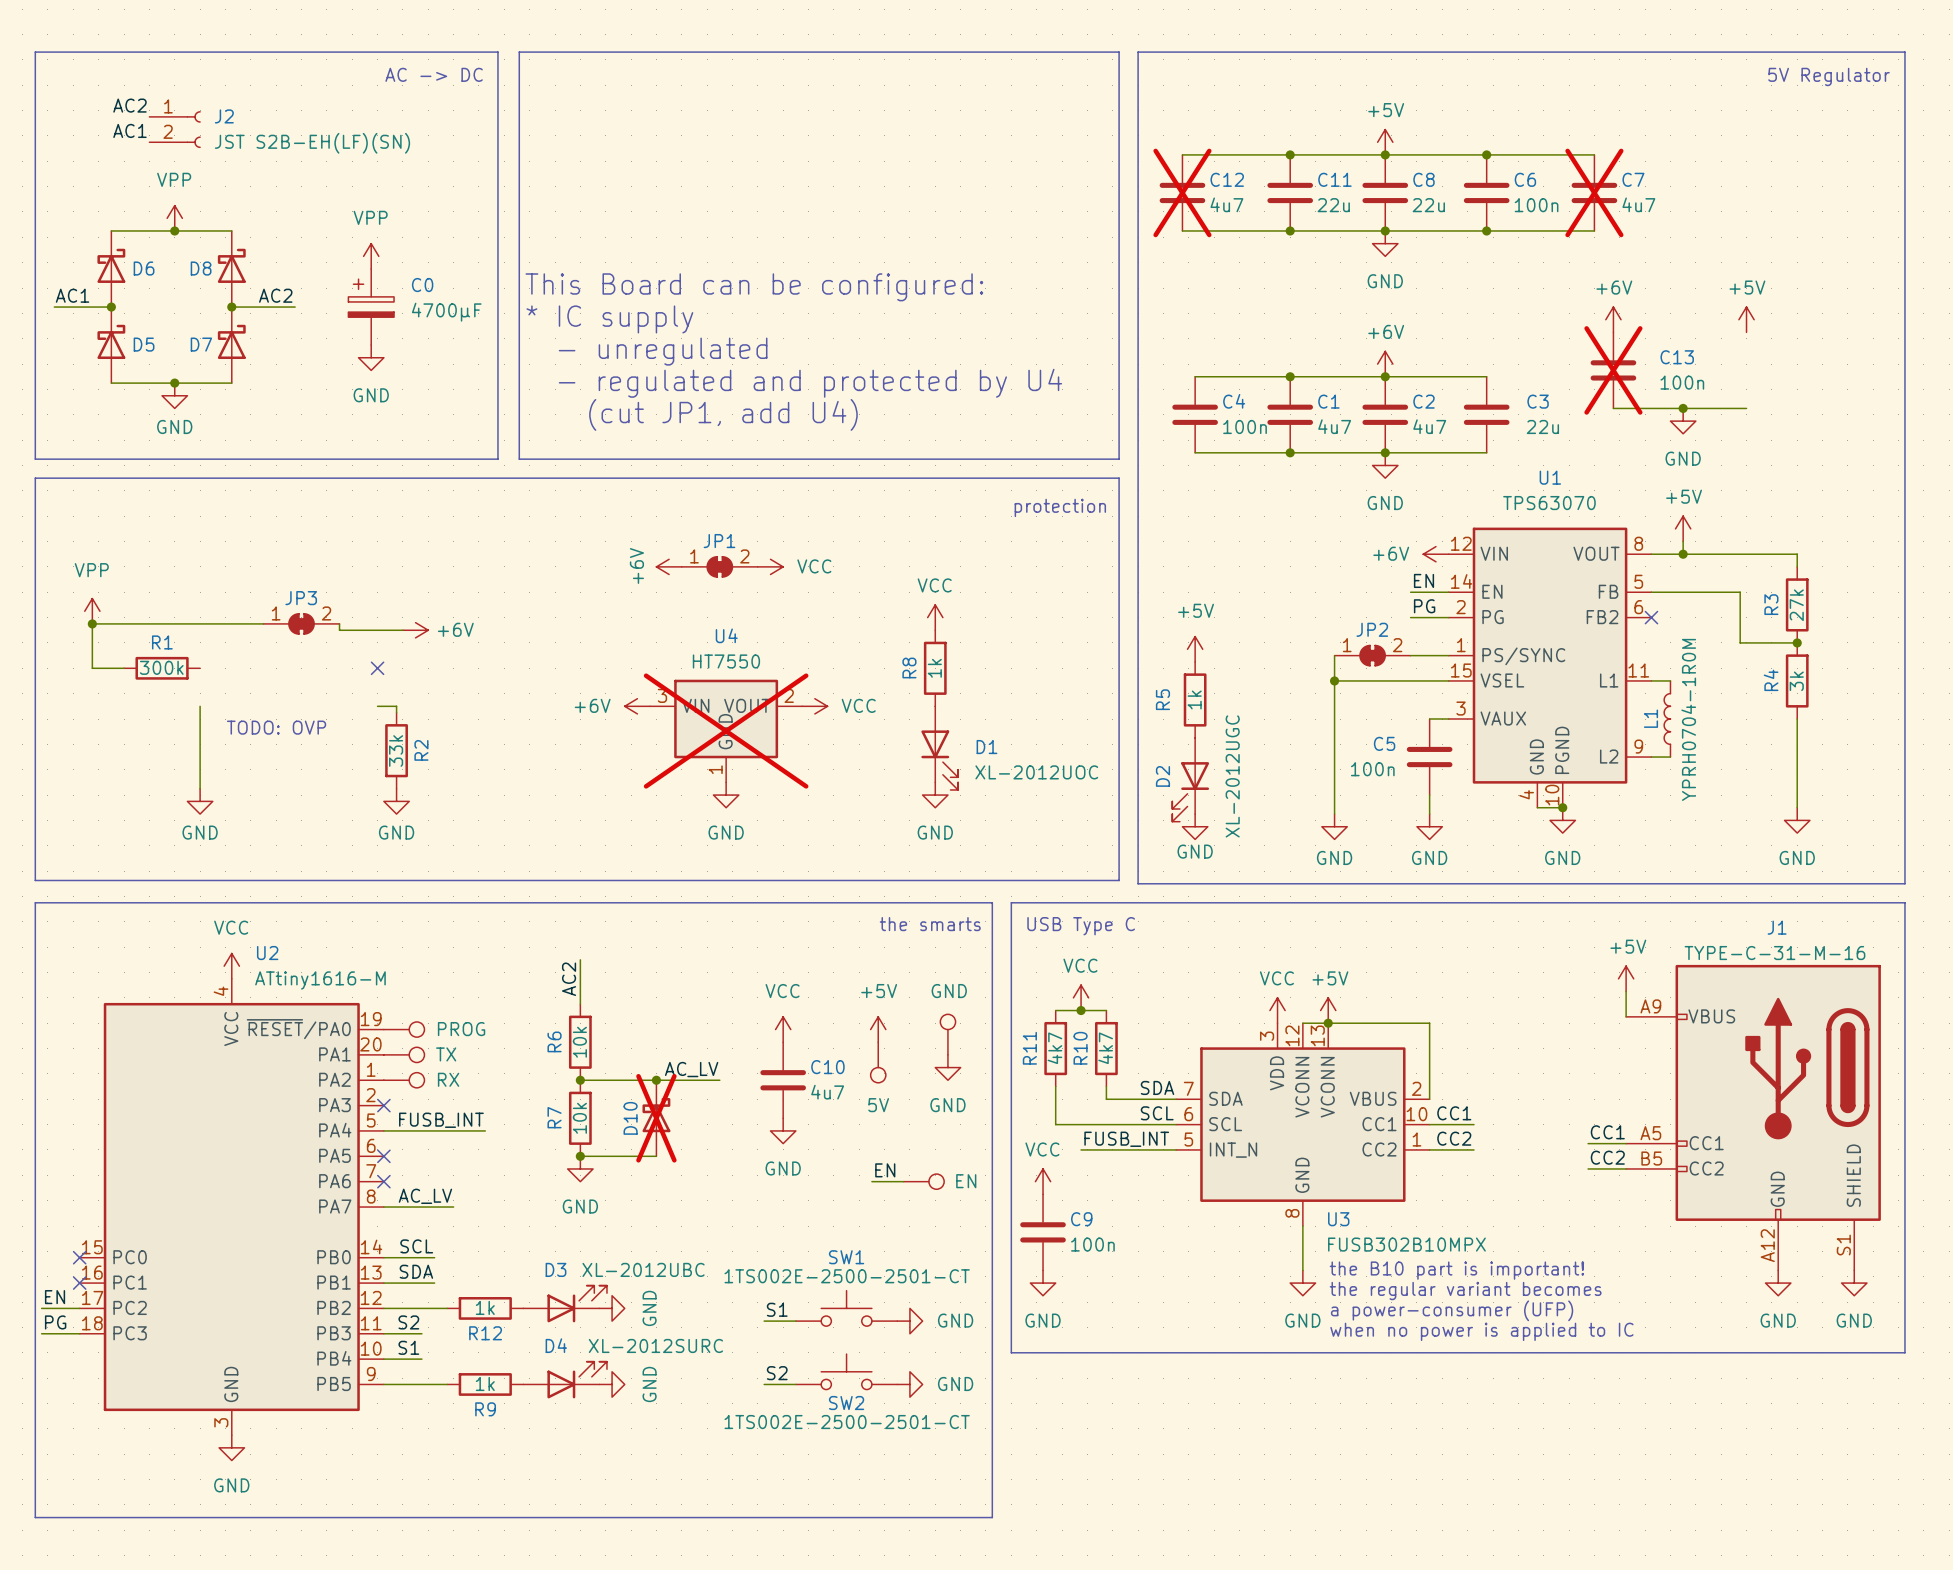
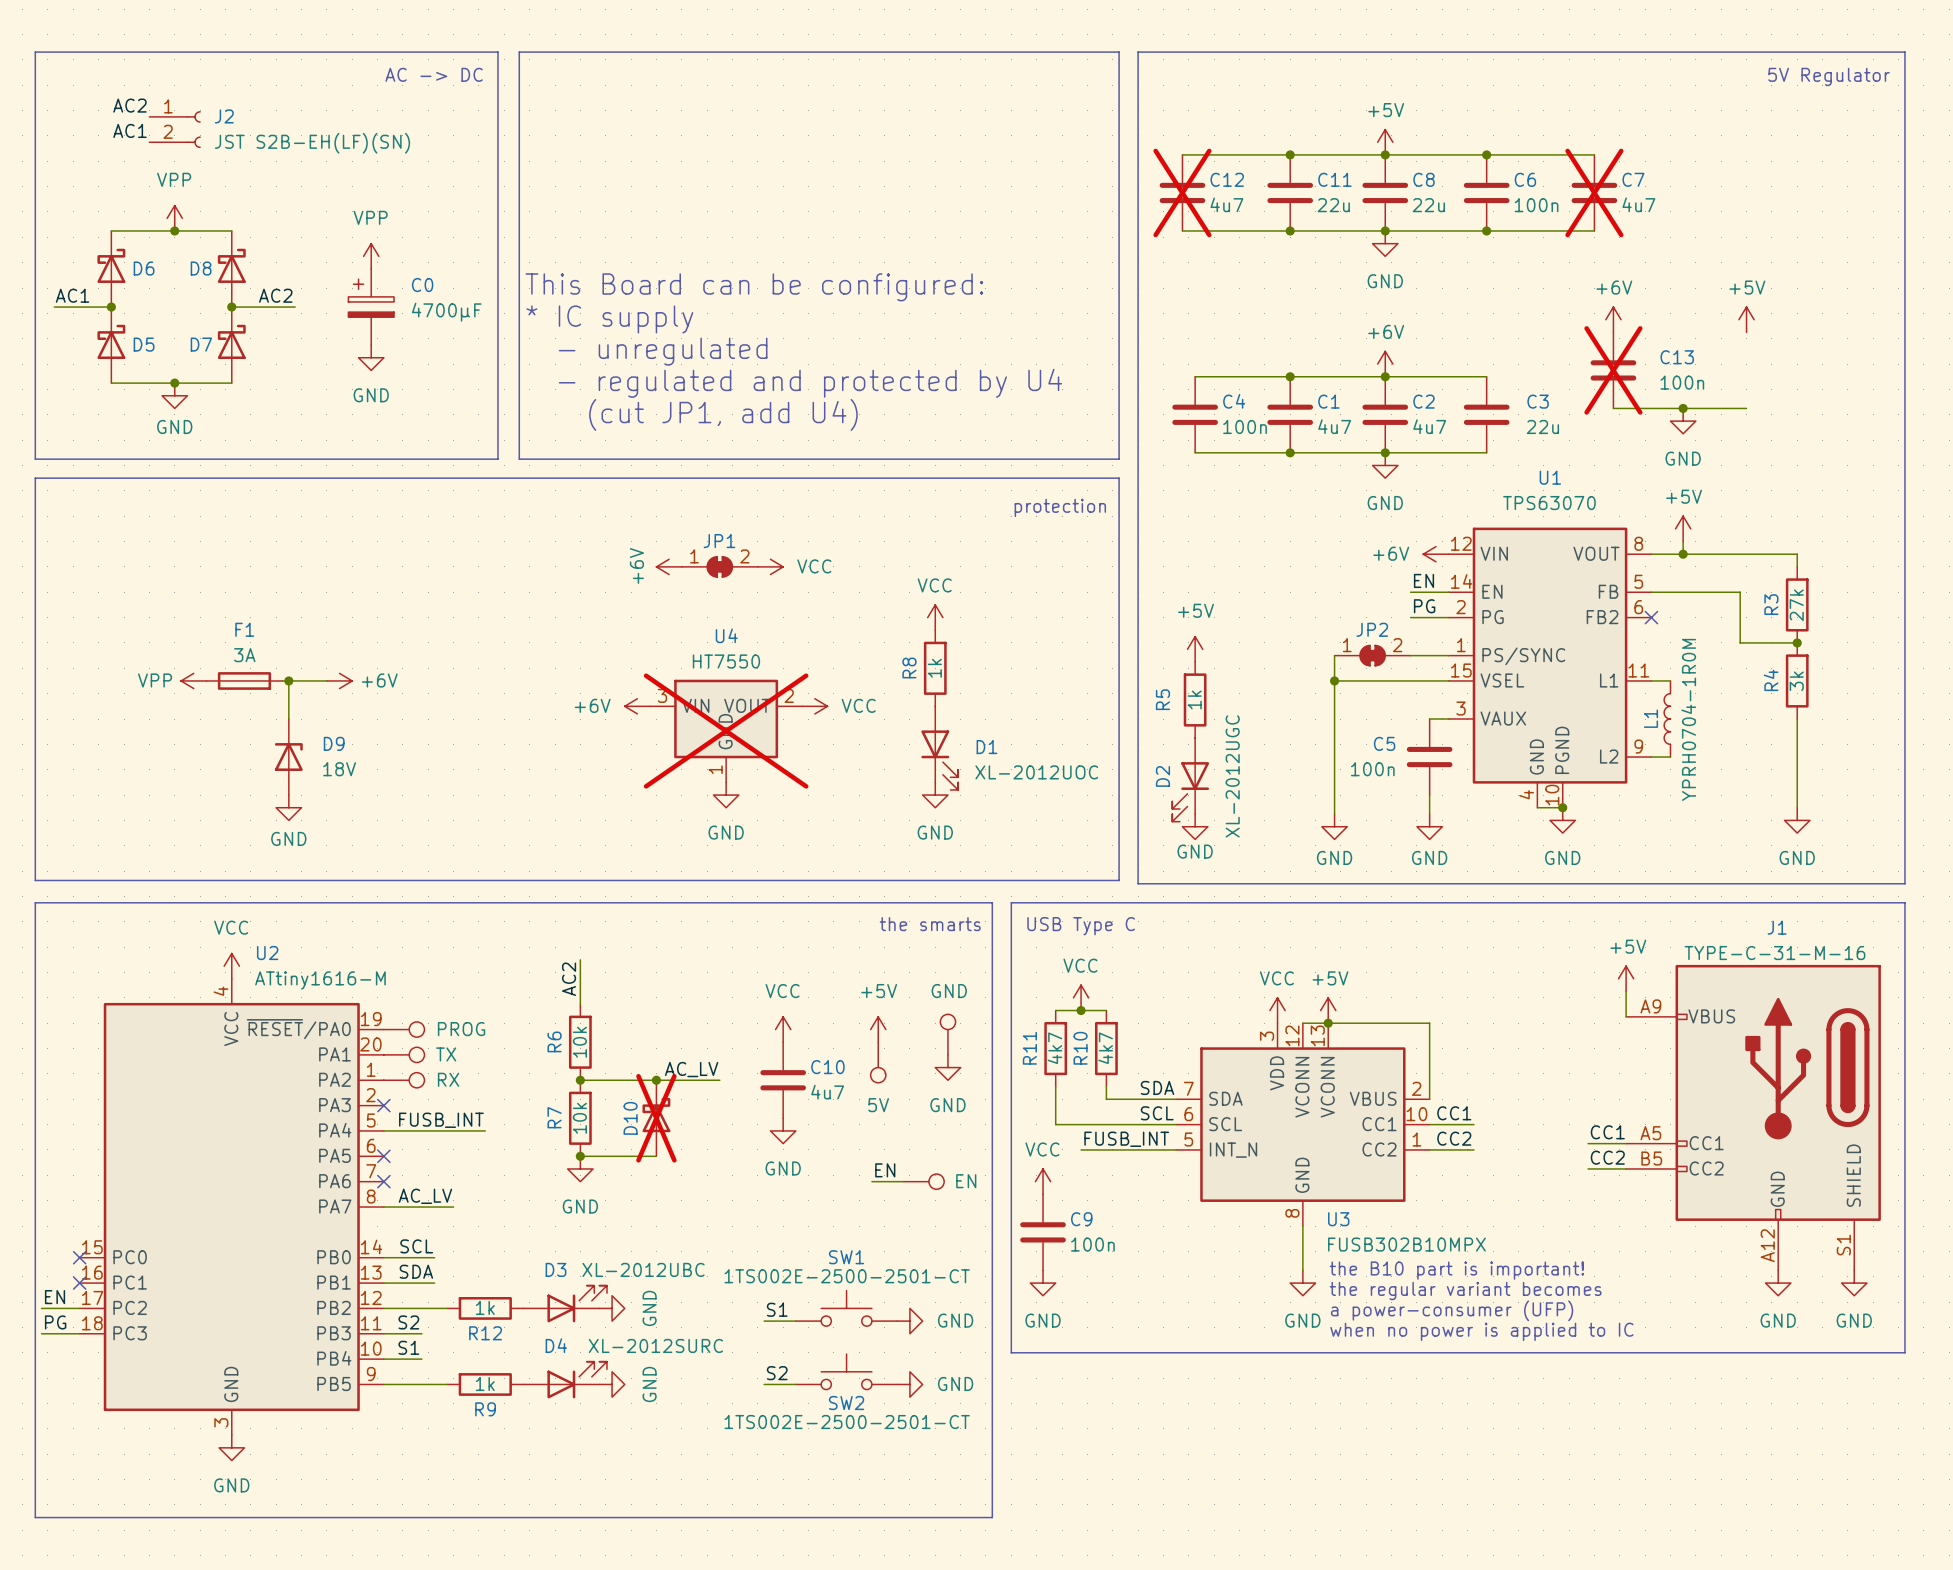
power symbol rotation: 0° (92, 611) -> 90° counterclockwise (193, 680)
power symbol position: VPP (92, 611) -> VPP (193, 680)
junction: (92, 623) -> none
wire: (263, 623) (92, 623) (92, 668) (124, 668) -> none
JP3: (301, 623) -> none
wire: (339, 623) (339, 630) (402, 630) -> none
power symbol position: +6V (415, 630) -> +6V (339, 680)
R1: 300k (162, 668) -> none
no-connect mark: (377, 668) -> none
F1: none -> 3A (244, 680)
wire: none -> (282, 680) (326, 680)
wire: none -> (288, 680) (288, 719)
junction: none -> (288, 680)
wire: (200, 706) (200, 788) -> none
wire: (377, 706) (396, 706) (396, 712) -> none
text: TODO: OVP (276, 727) -> none
R2: 33k (396, 750) -> none
D9: none -> 18V (288, 757)
power symbol: GND (200, 801) -> none
power symbol: GND (396, 801) -> none
power symbol: none -> GND (288, 807)

